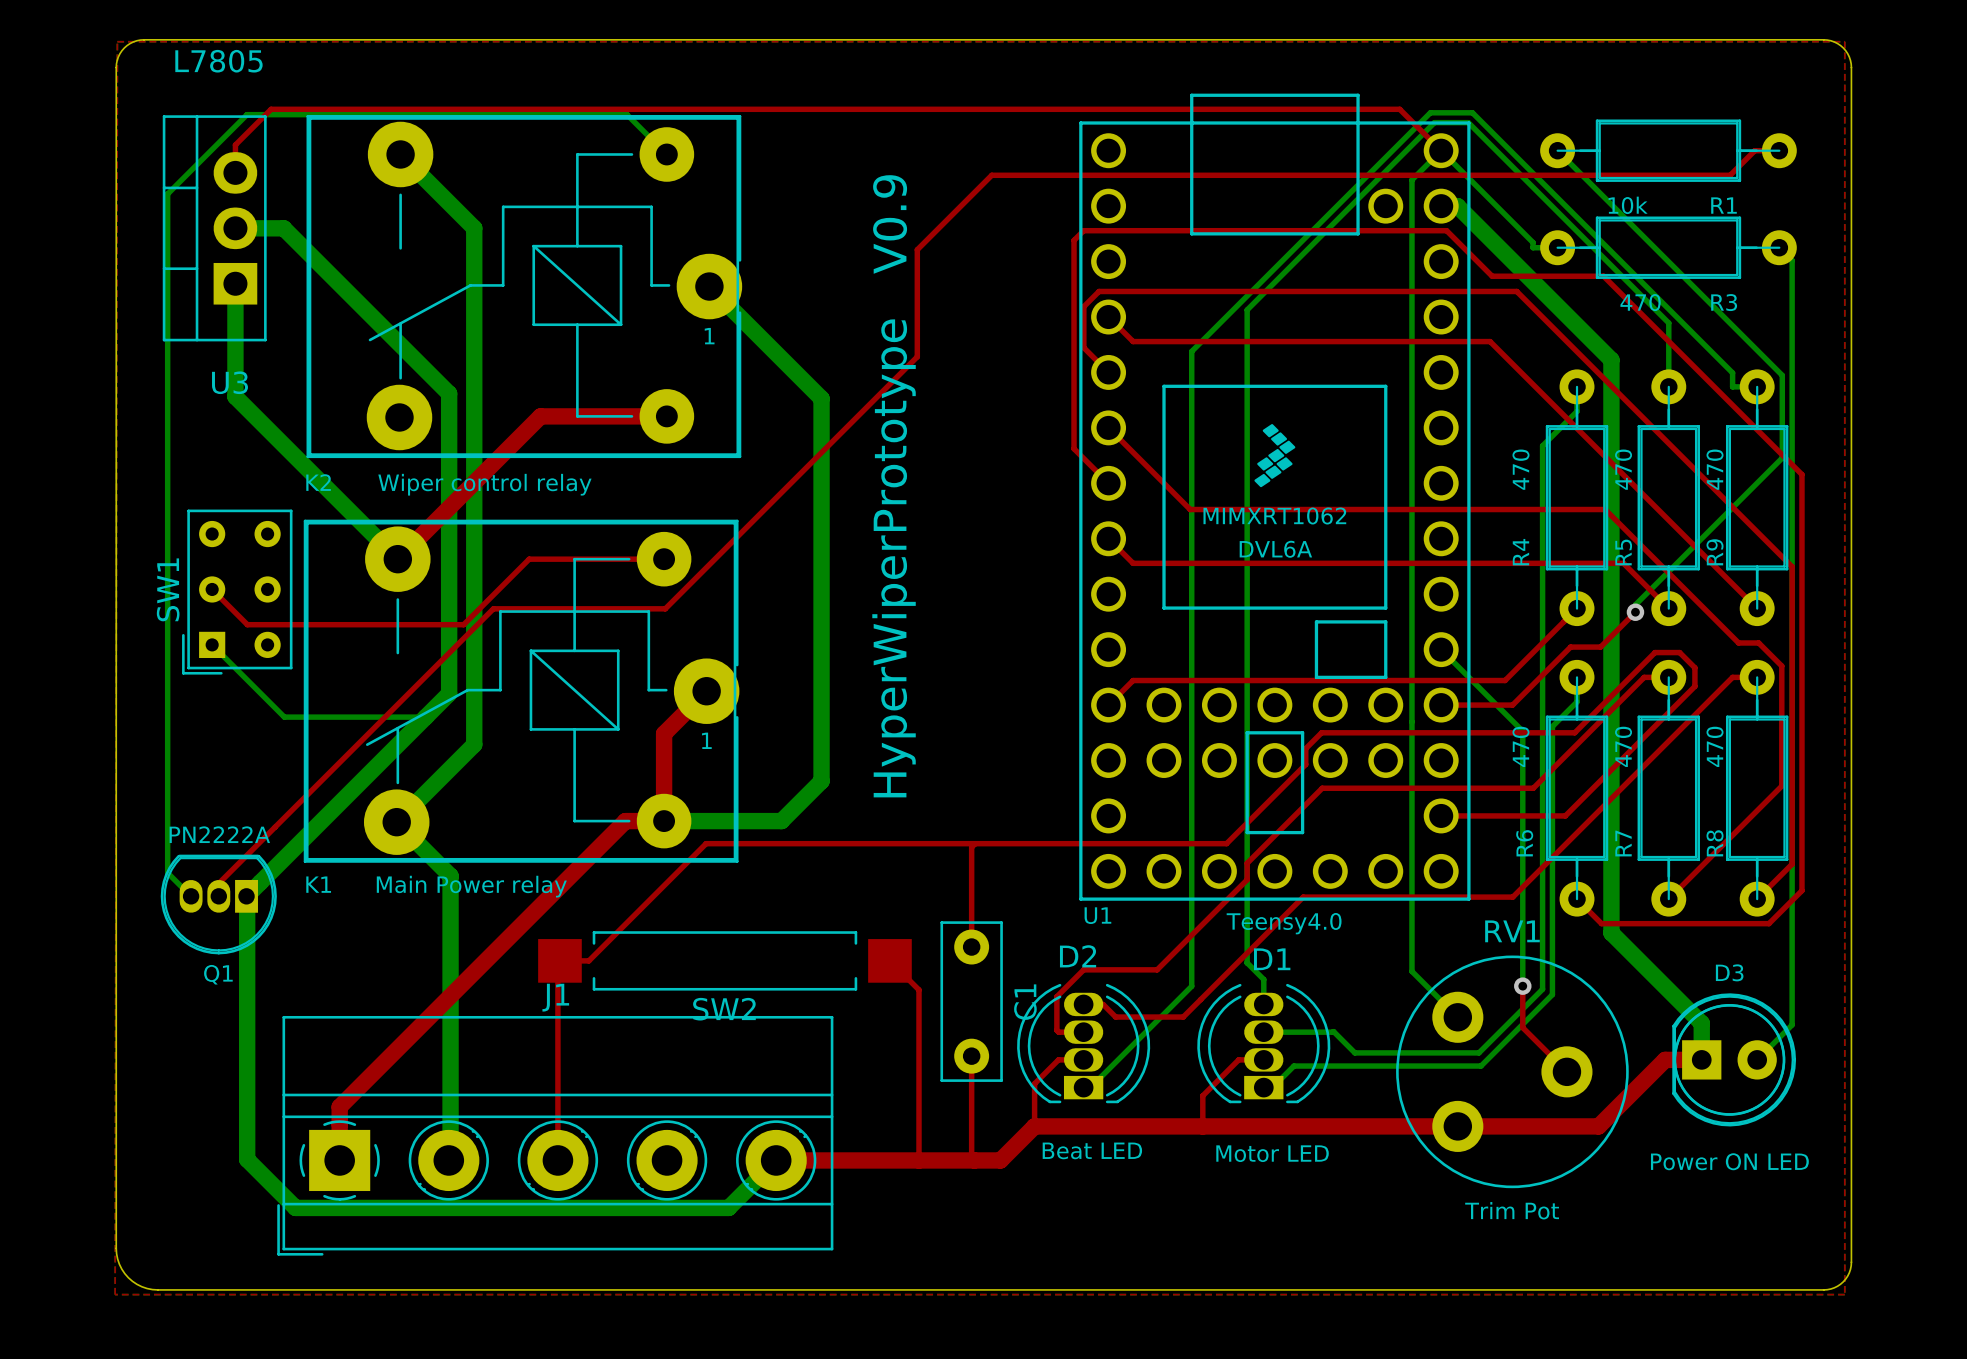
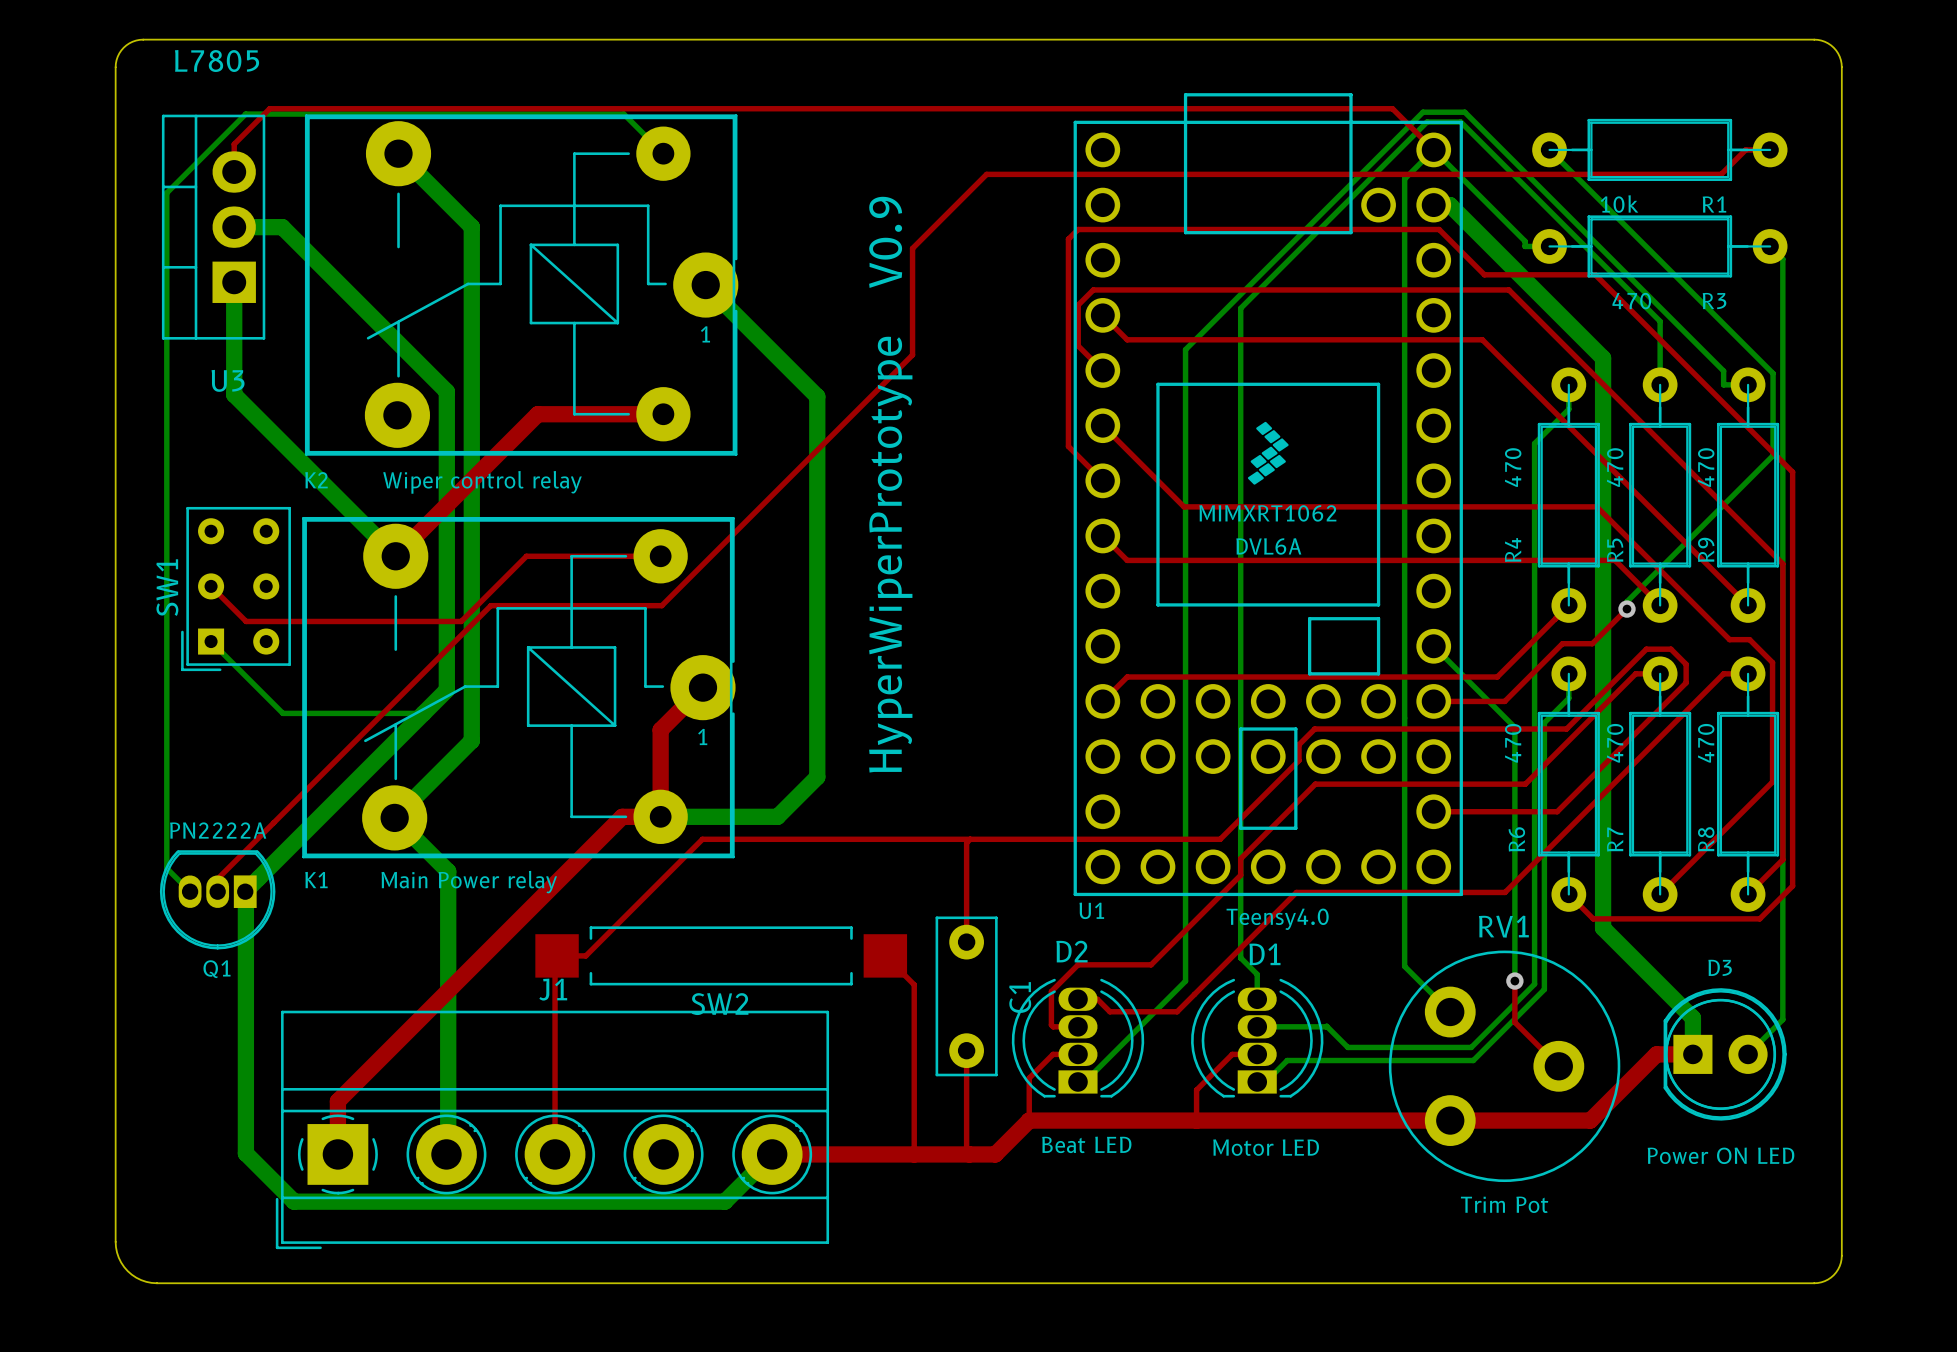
top zone outline: (117, 41) (115, 1294) (1844, 1294) (1844, 41) (117, 41) -> none

